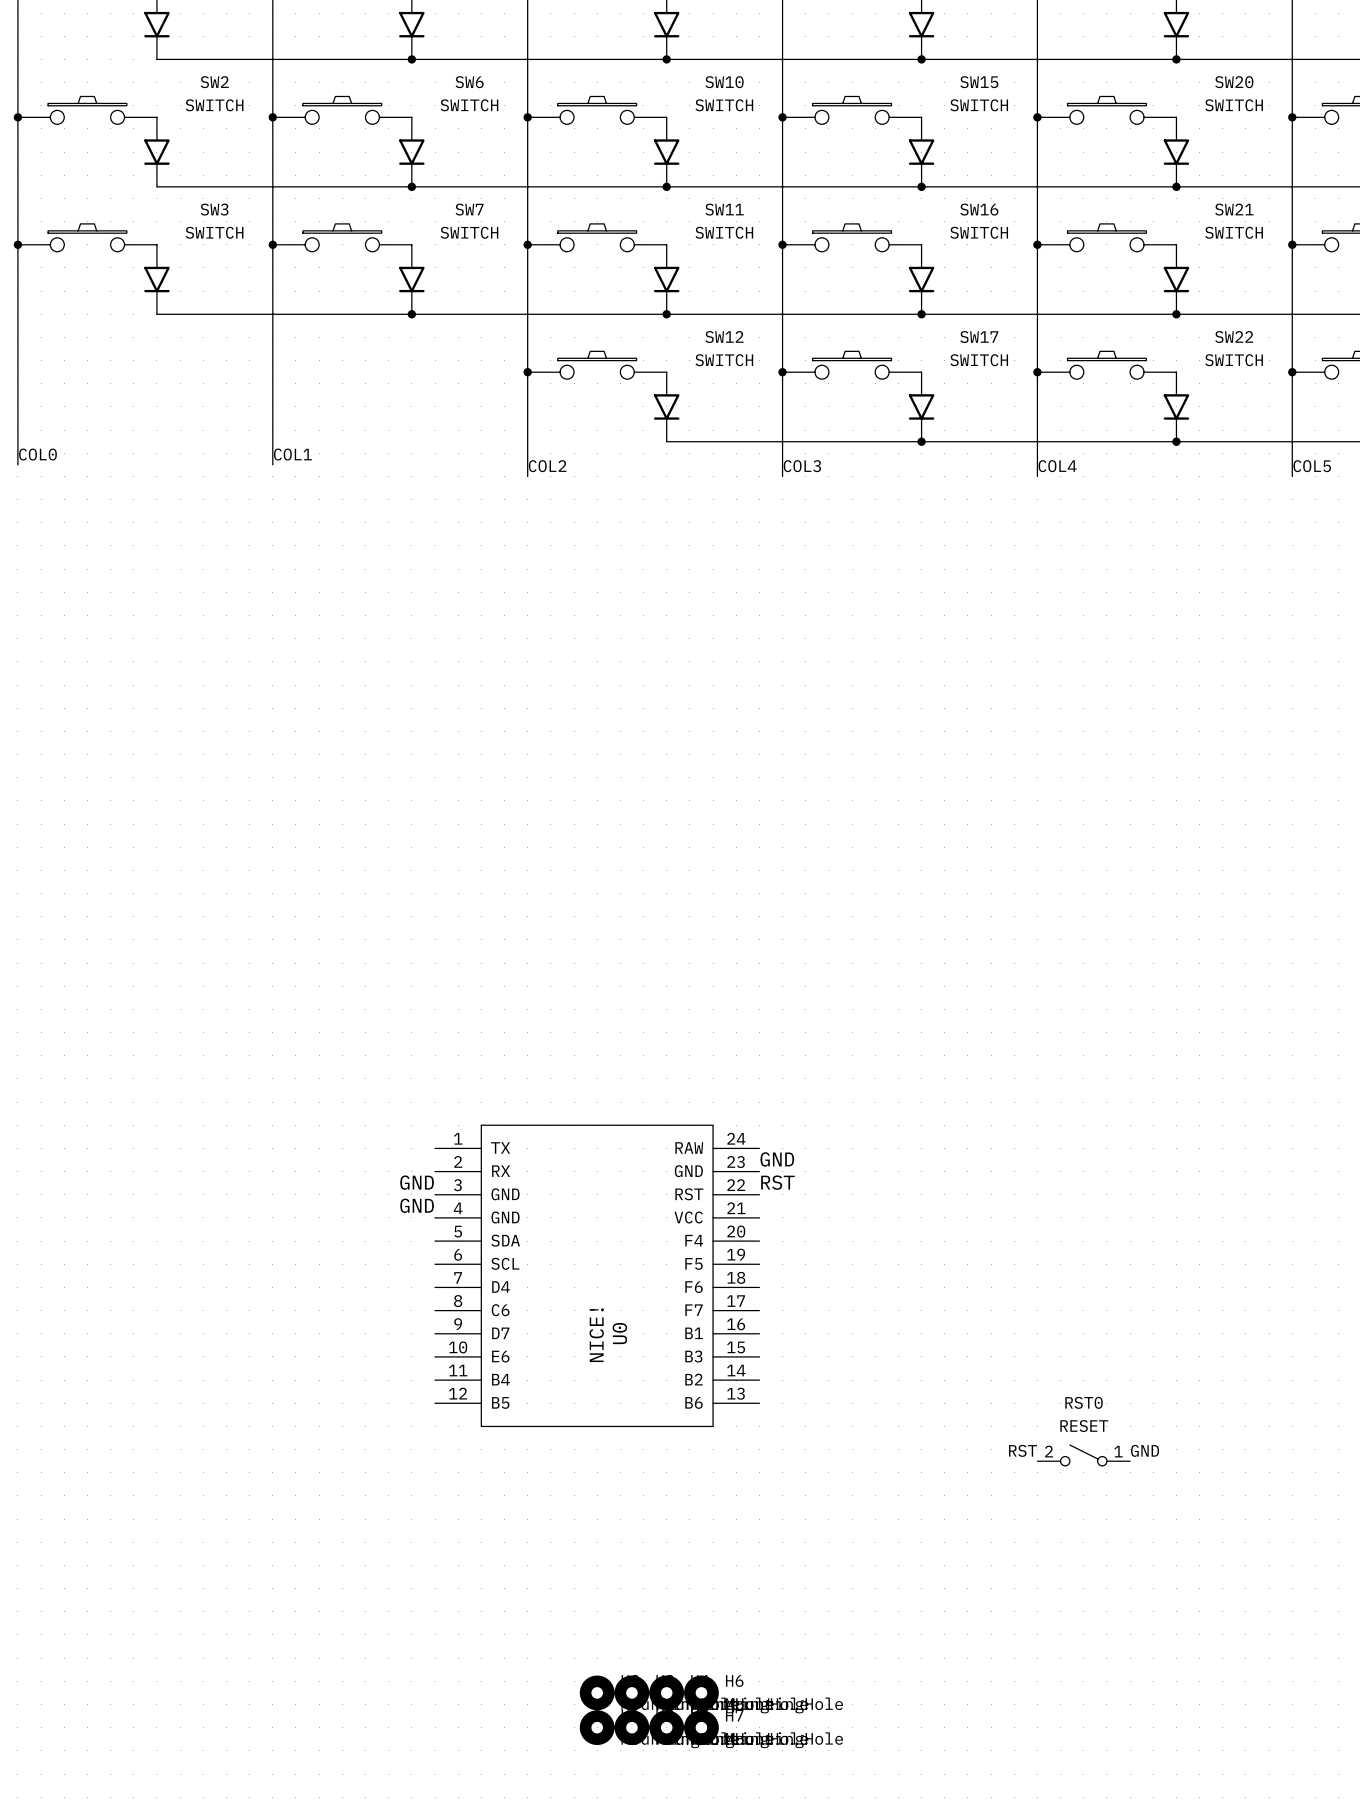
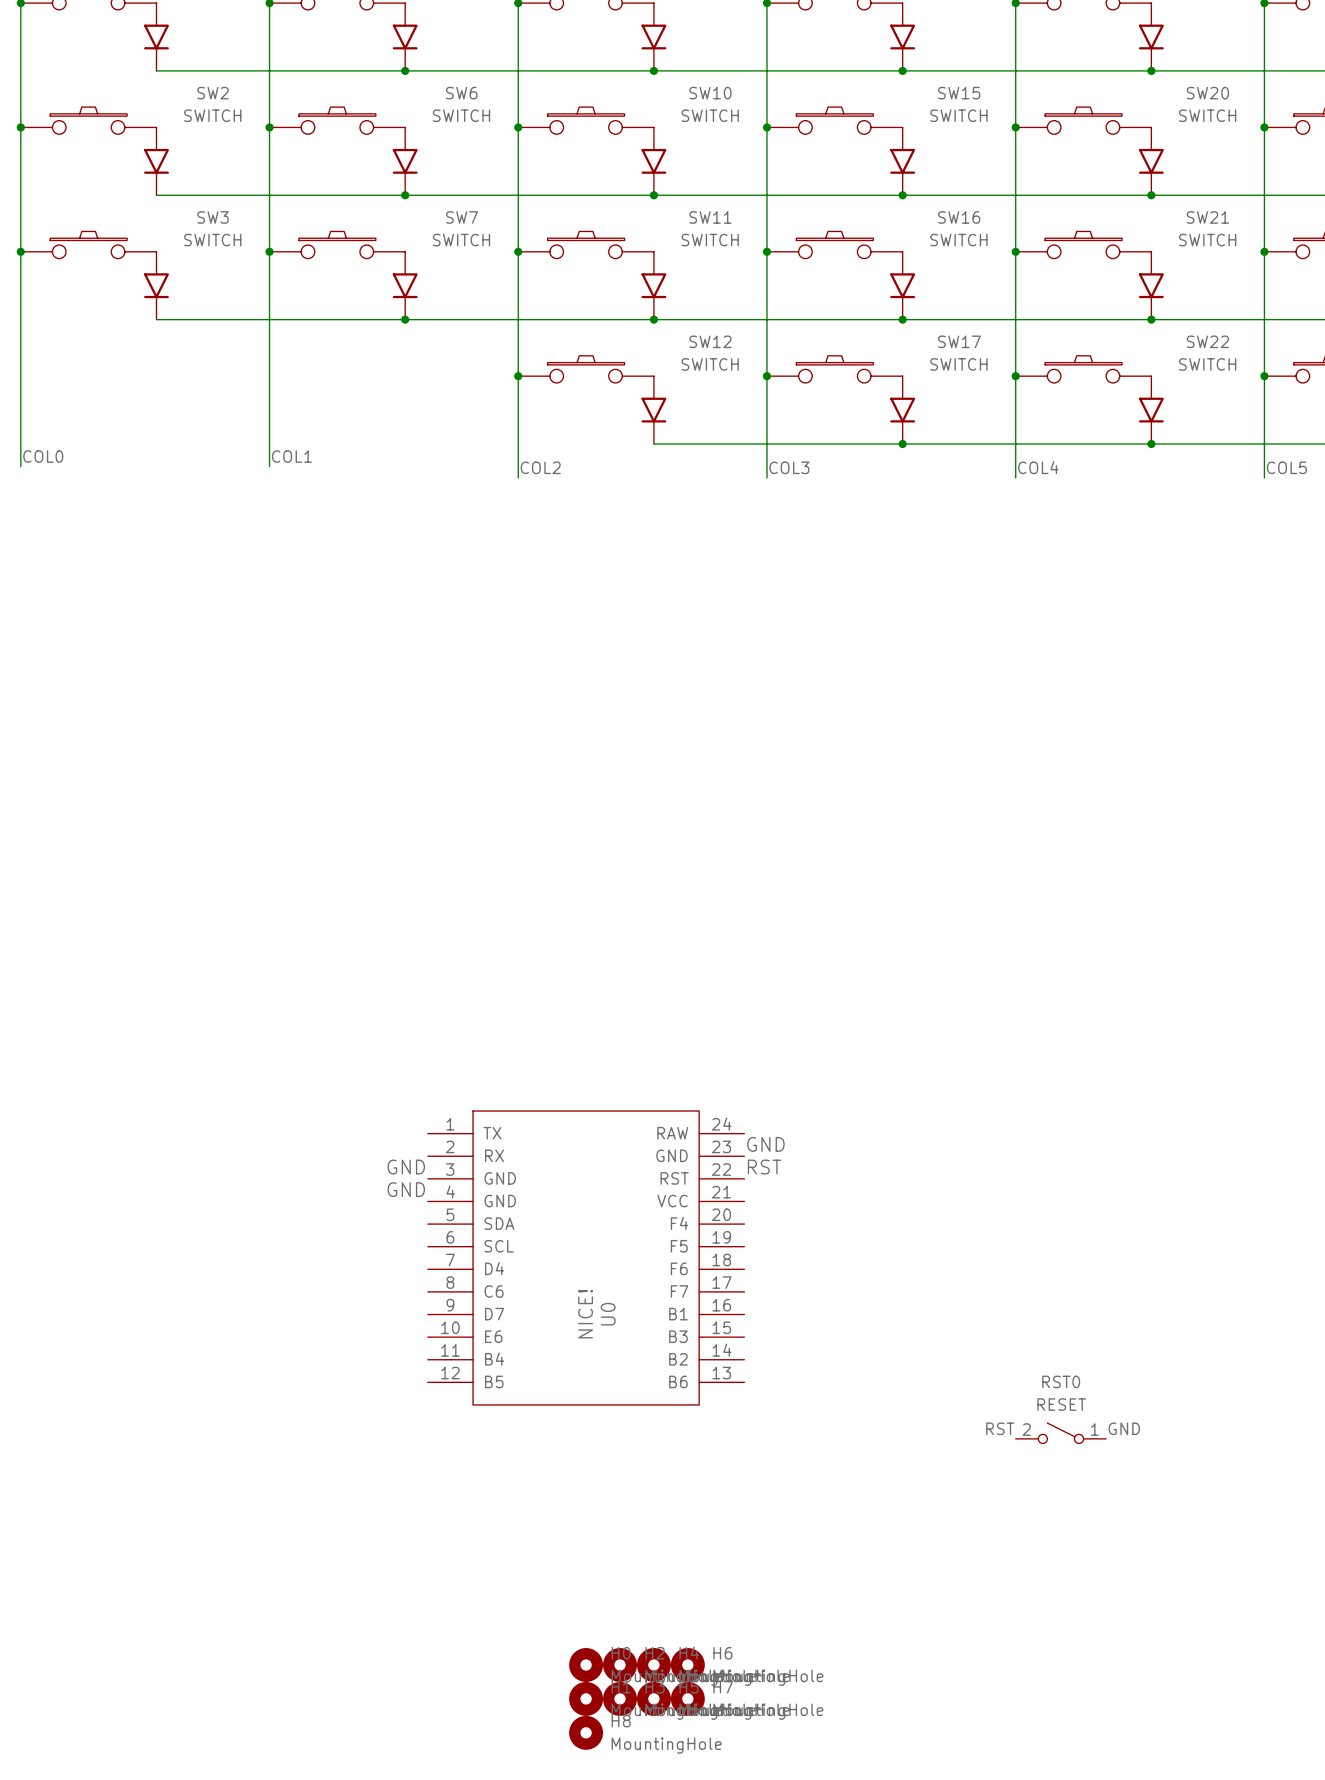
H8: none -> MountingHole (586, 1732)

